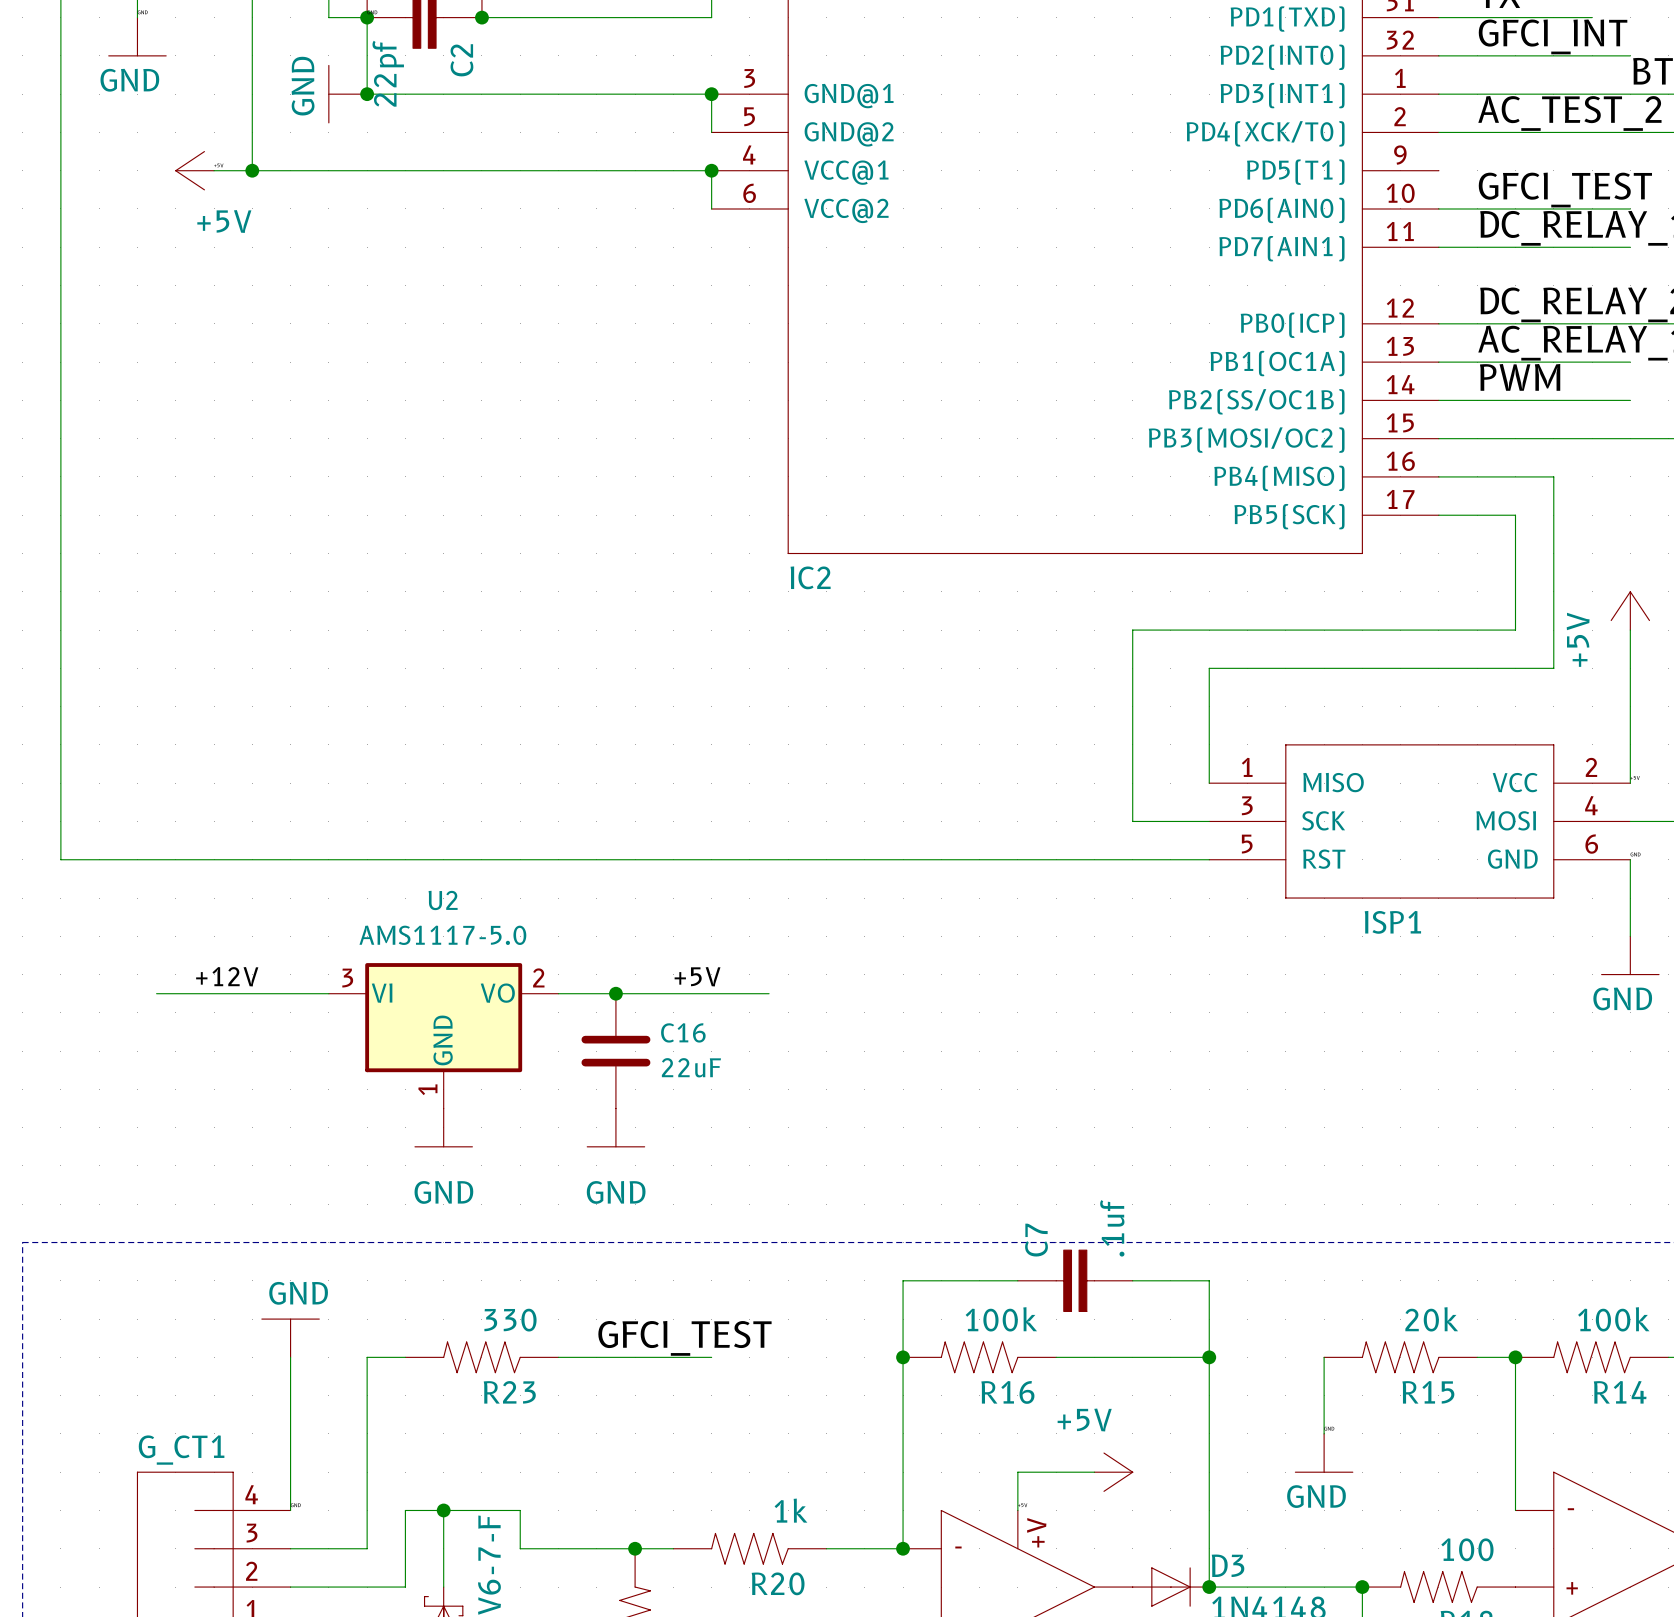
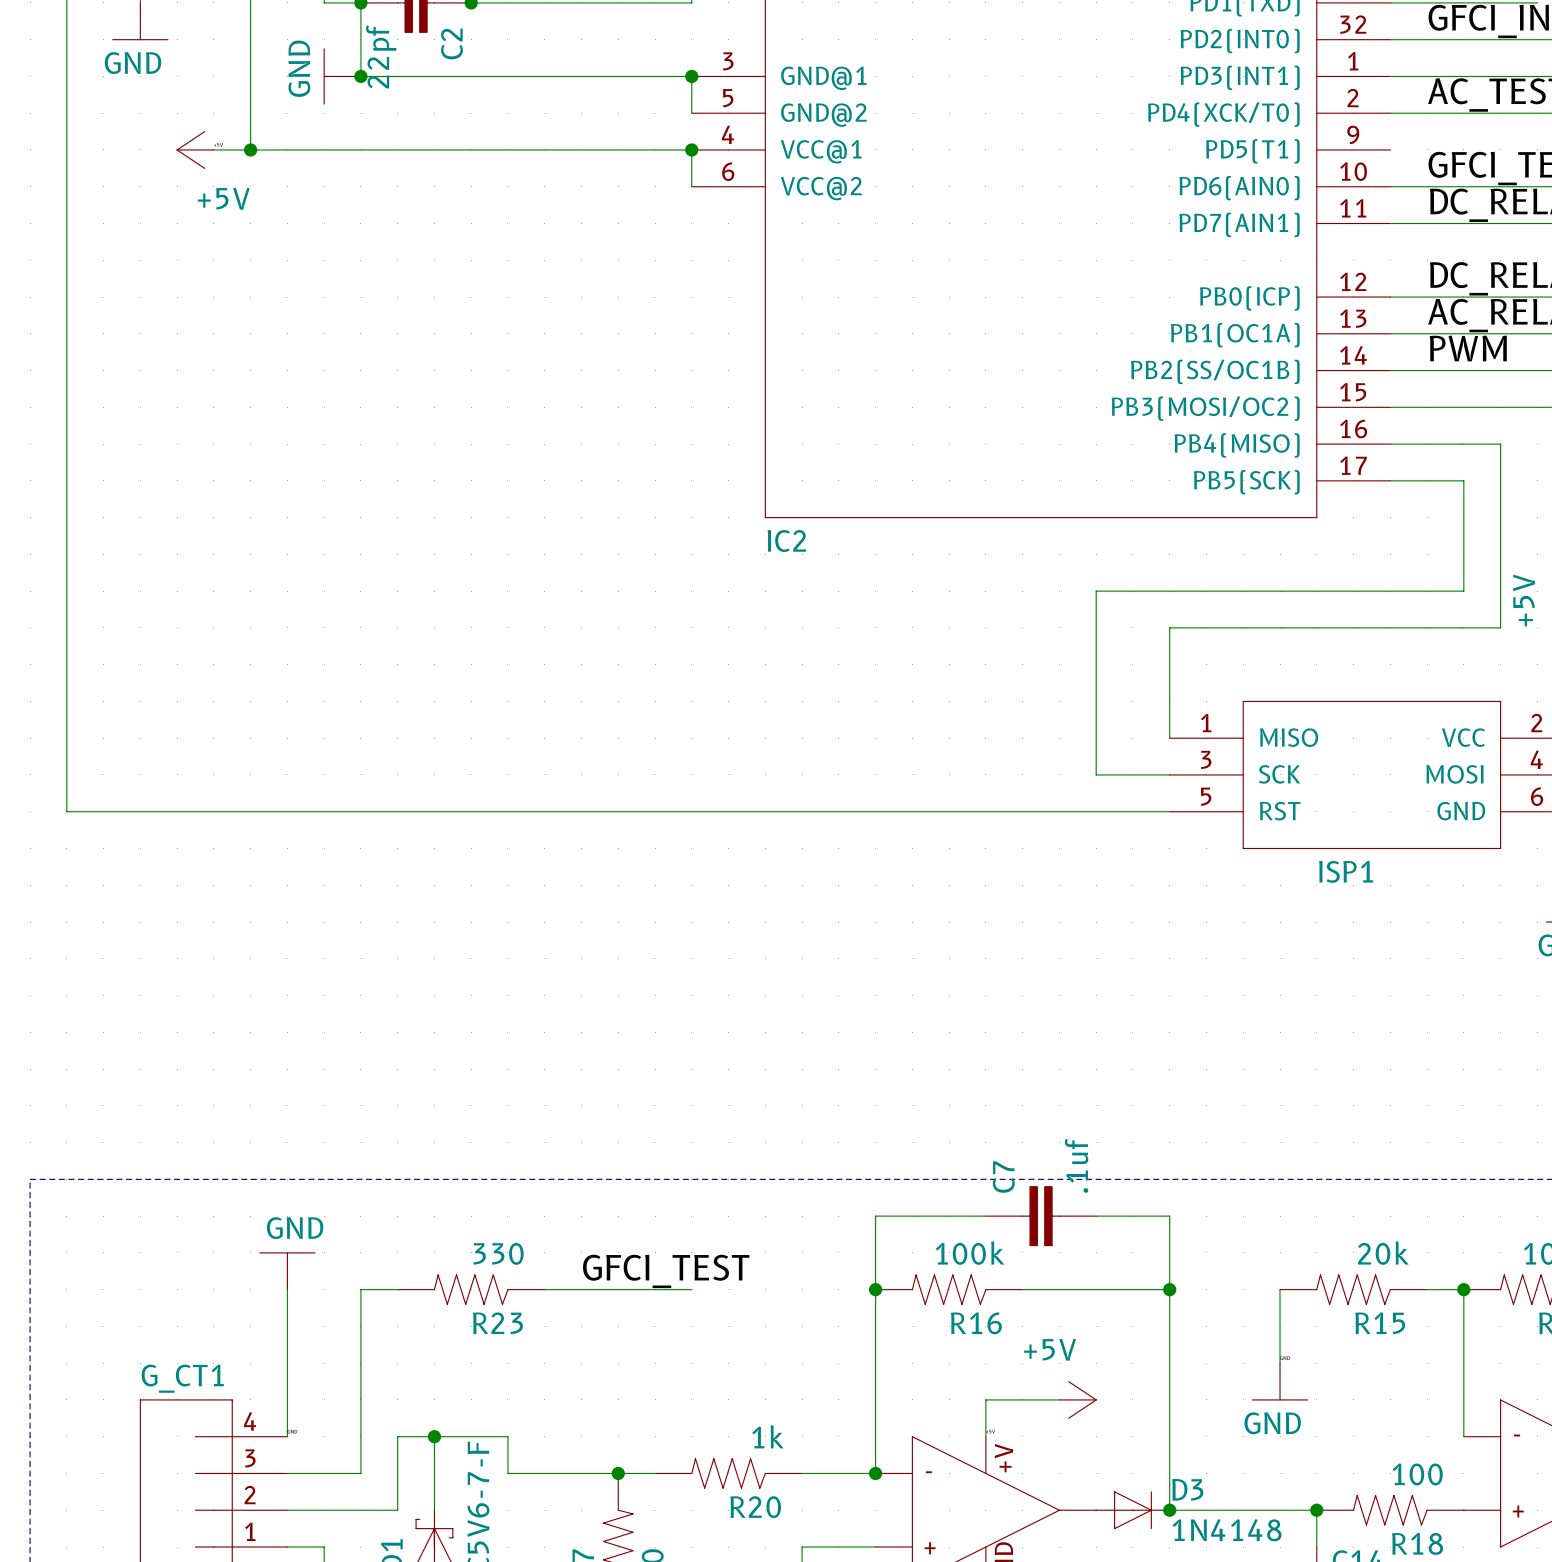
label: +12V (227, 976) -> none
label: +5V (697, 976) -> none
wire: (156, 993) (328, 993) -> none
wire: (558, 993) (769, 993) -> none
junction: (615, 993) -> none
U2: AMS1117-5.0 (443, 1035) -> none
C16: 22uF (615, 1051) -> none
power symbol: GND (443, 1127) -> none
power symbol: GND (615, 1127) -> none

